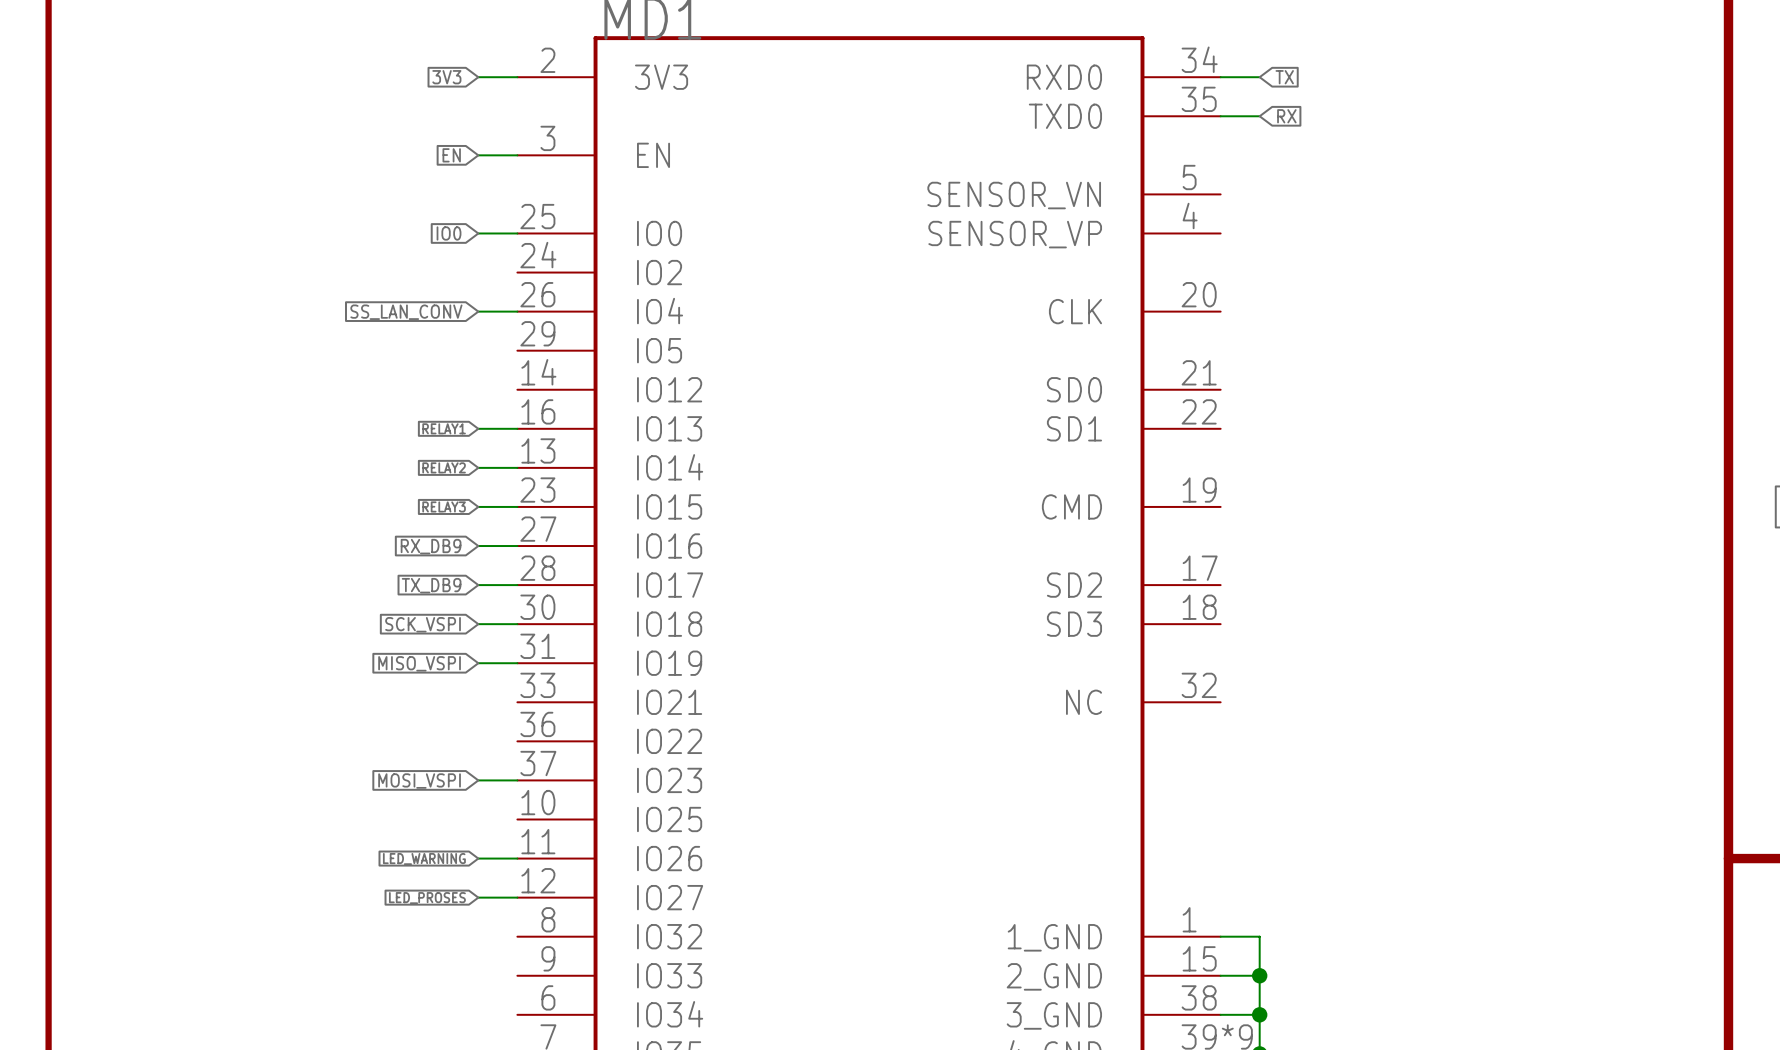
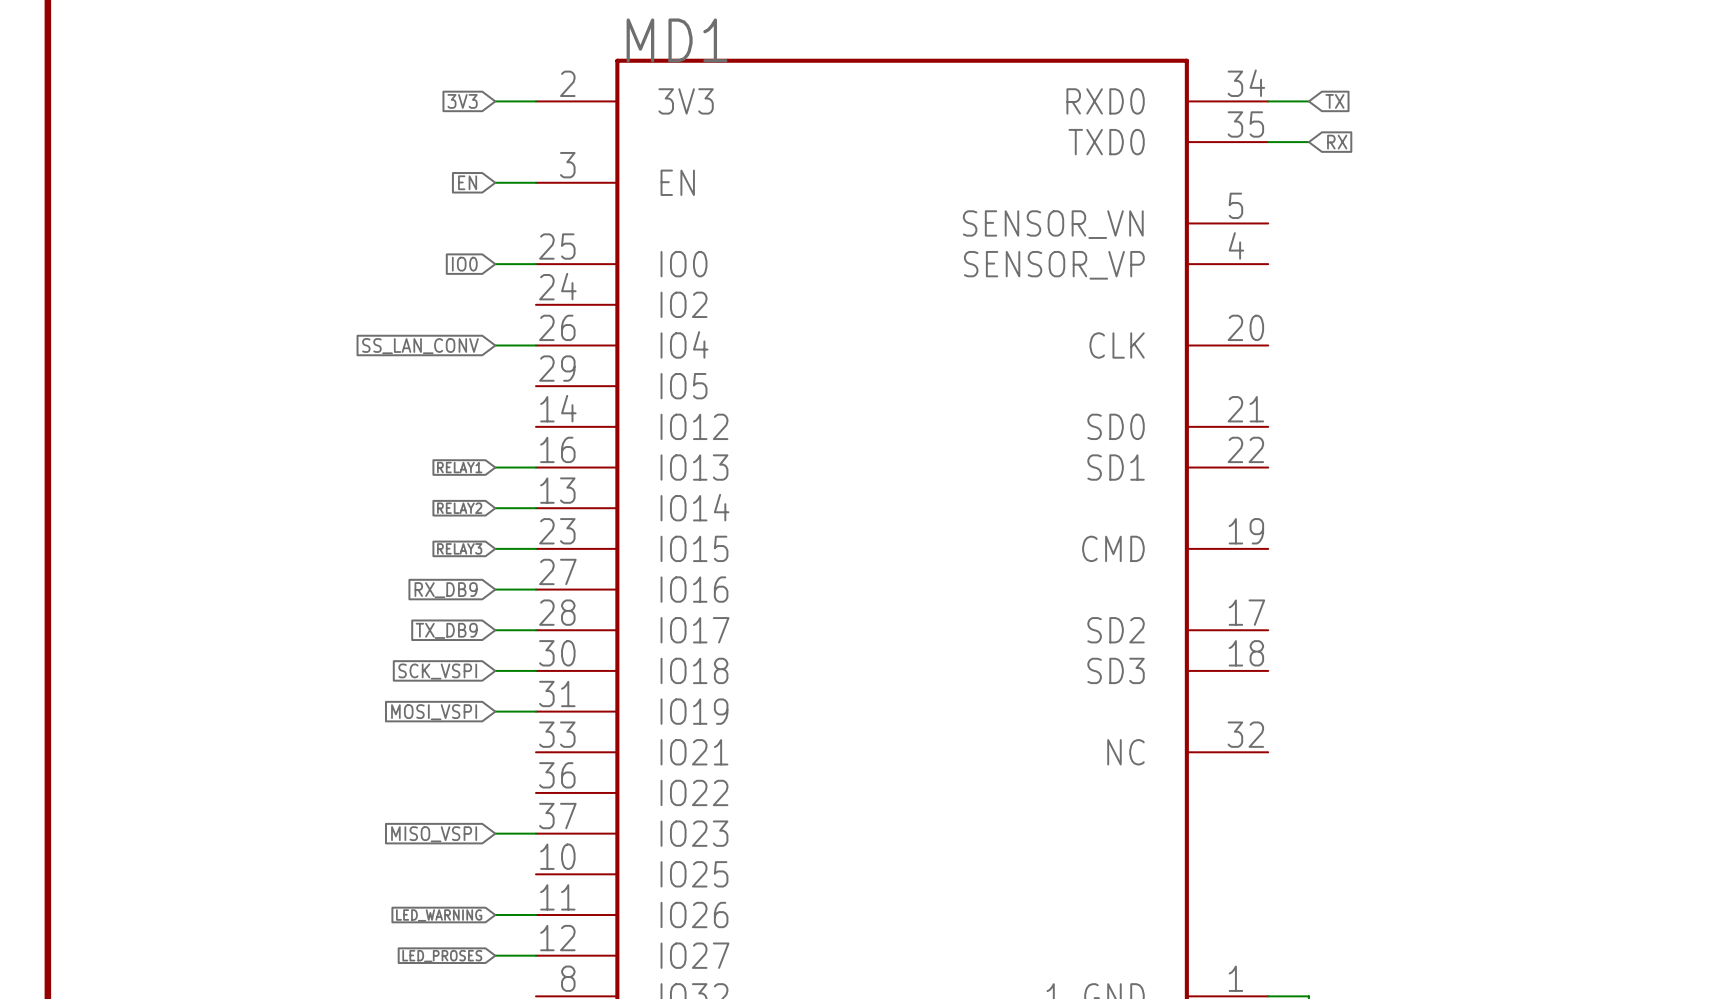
global label: MISO_VSPI (419, 663) -> MOSI_VSPI (434, 712)
global label: MOSI_VSPI (419, 781) -> MISO_VSPI (434, 834)

